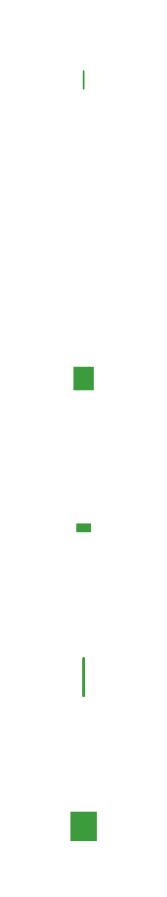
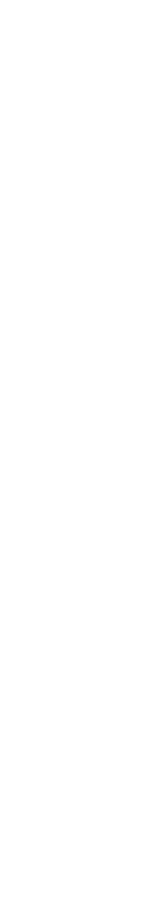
part: (83, 79) -> none
part: (83, 378) -> none
part: (83, 527) -> none
part: (83, 677) -> none
part: (83, 826) -> none

